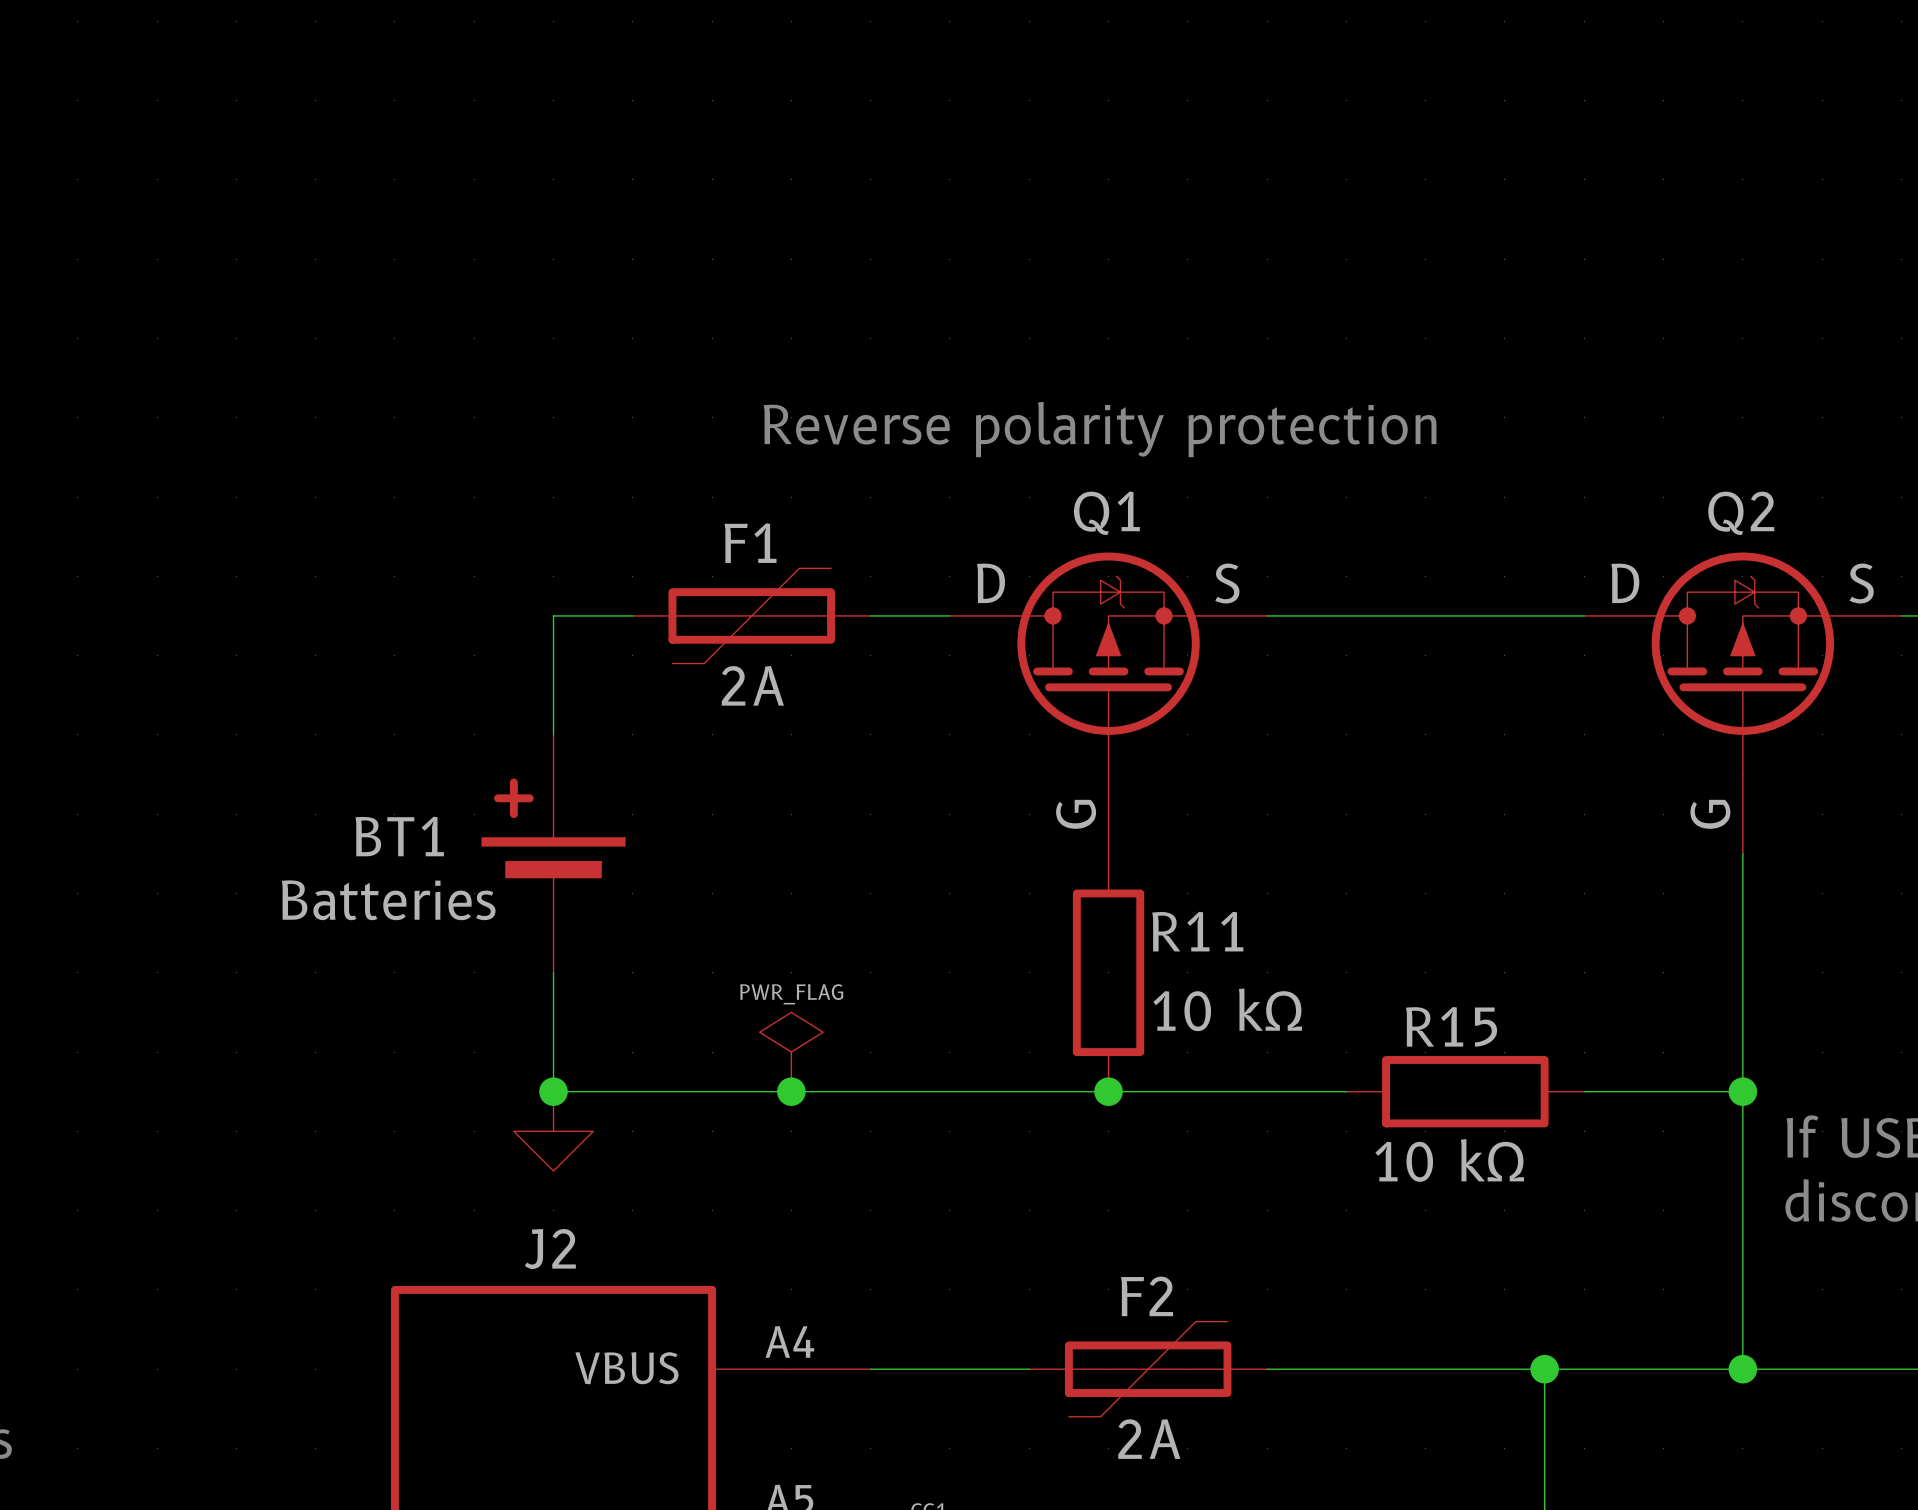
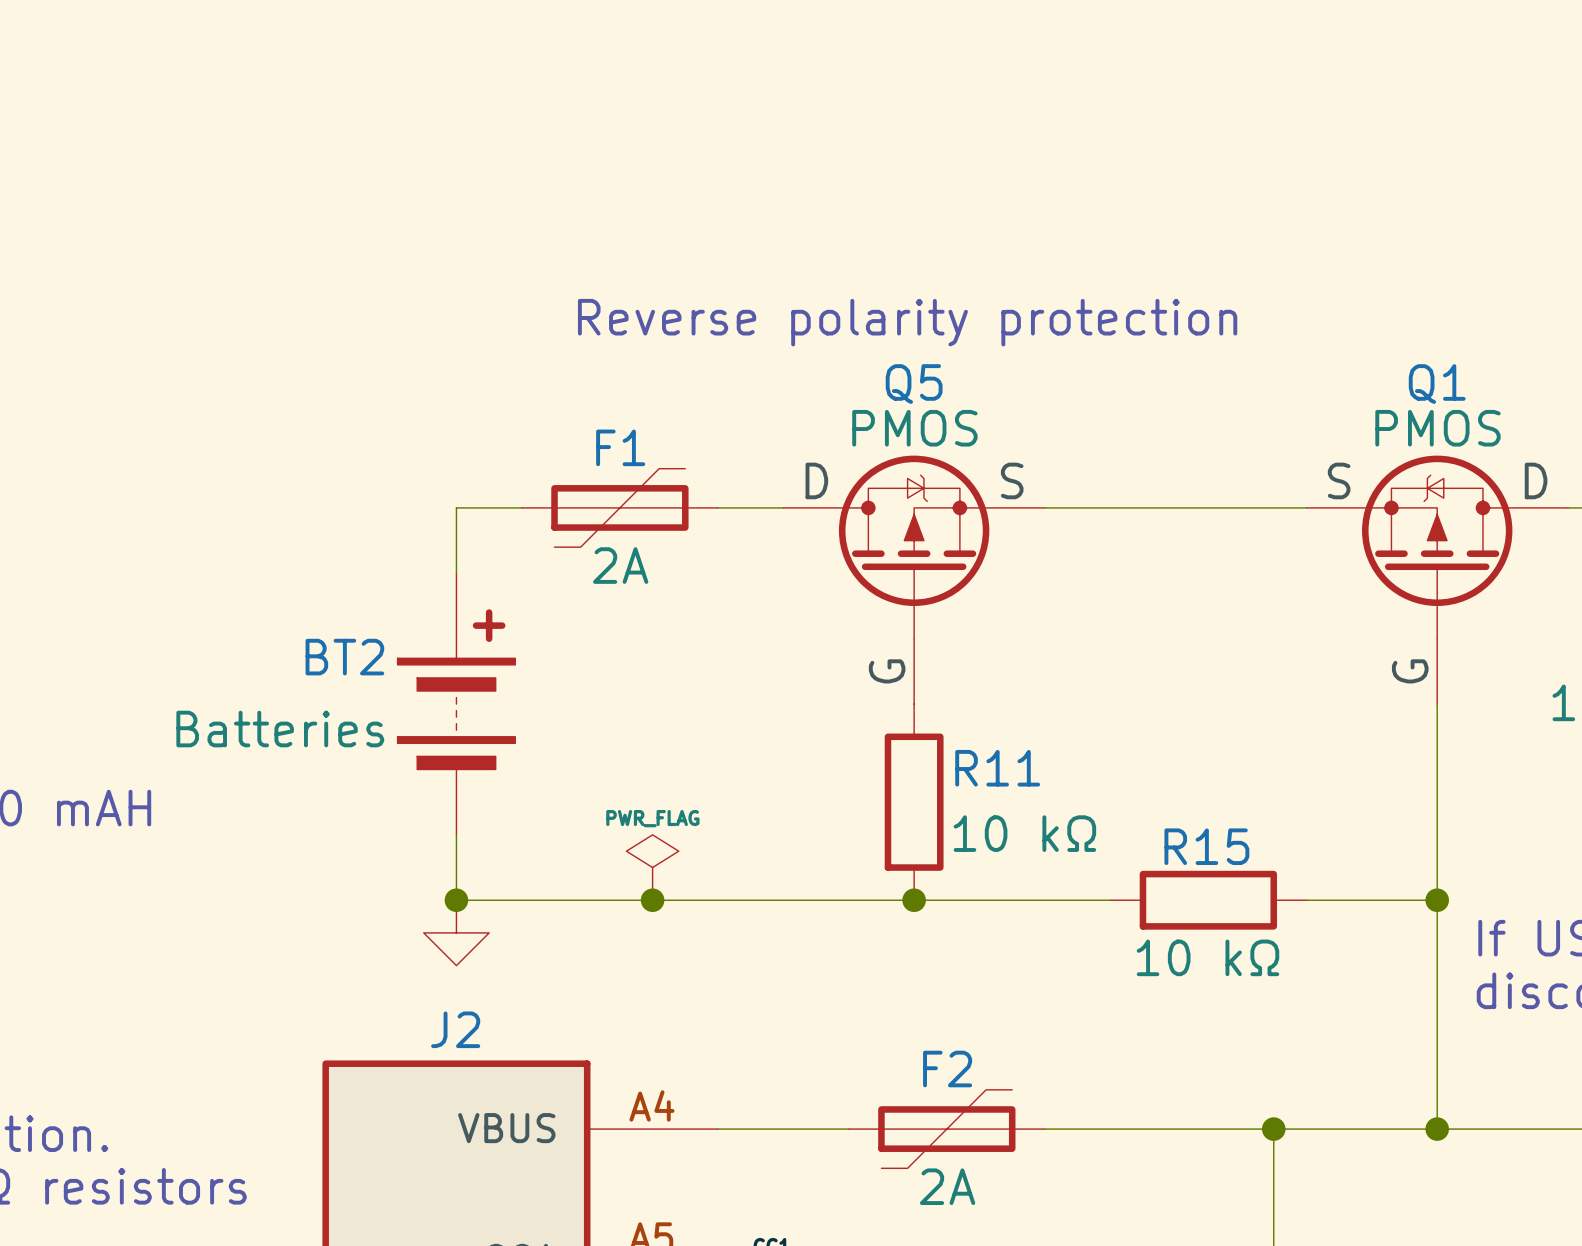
text position: Reverse polarity protection (1100, 429) -> Reverse polarity protection (907, 322)
Q1 name: Q1 (1106, 513) -> Q5 (914, 384)
Q1 value: none -> PMOS (914, 428)
Q2: (1742, 703) -> none
Q1: none -> PMOS (1437, 579)
BT1: Batteries (553, 853) -> none
BT2: none -> Batteries (456, 704)

